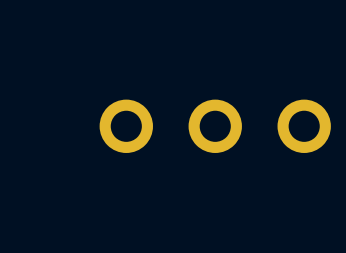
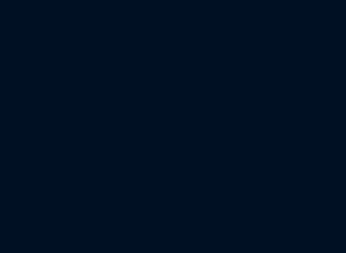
part: (215, 126) -> none

